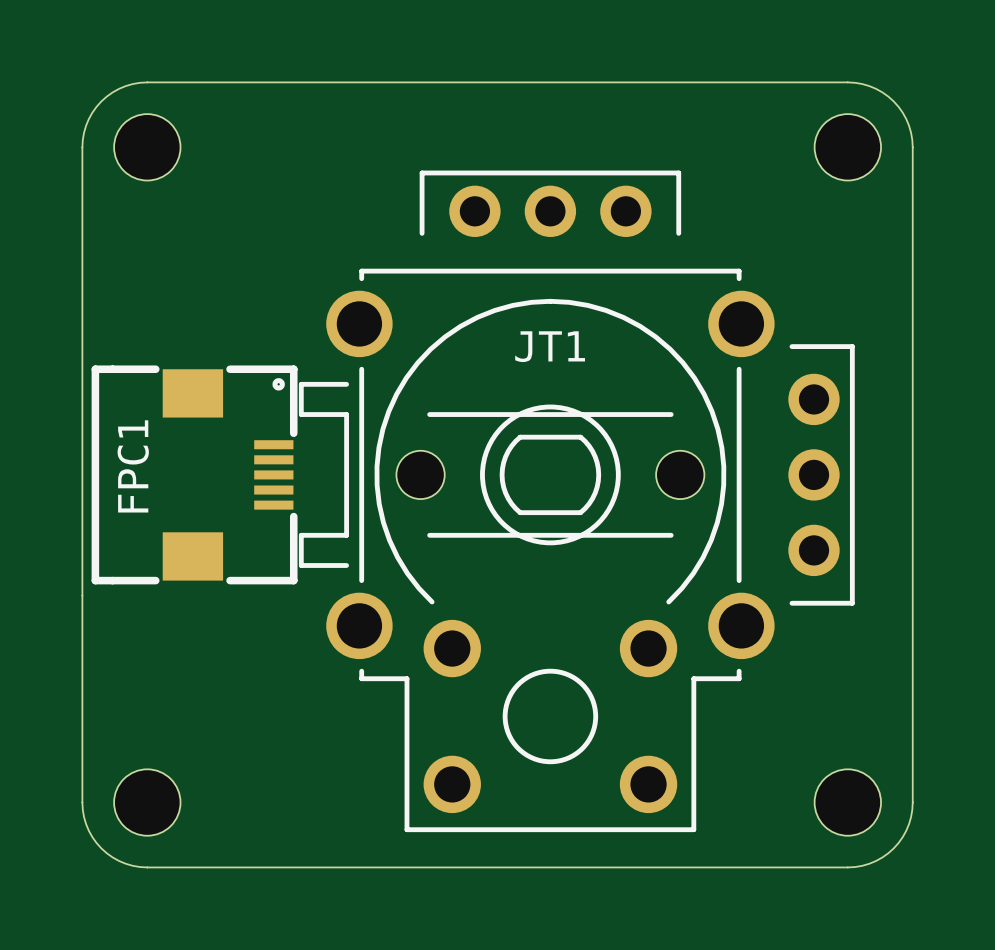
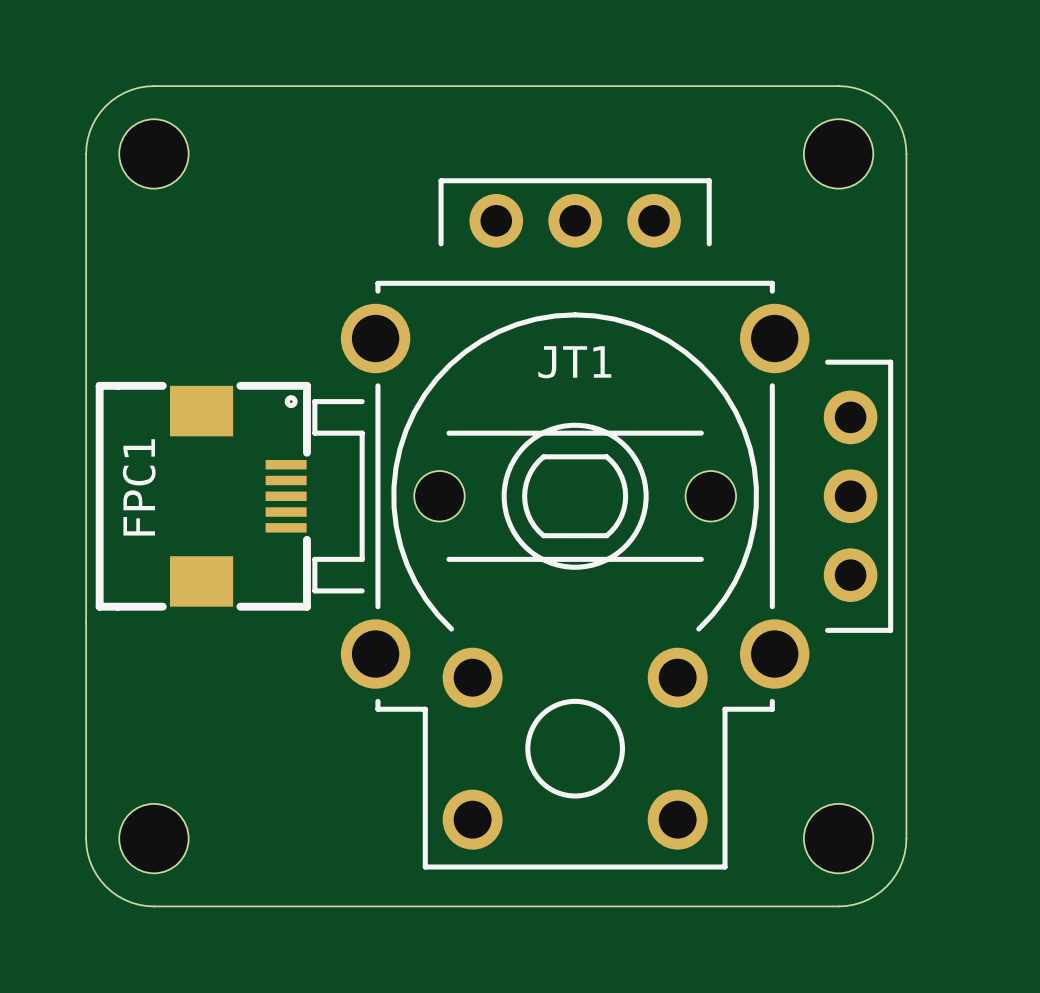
board edge: (802, 82) (855, 82) (869, 86) (882, 92) (893, 101) (902, 112) (909, 125) (912, 147) (912, 809) (909, 823) (902, 837) (888, 853) (875, 861) (855, 867) (802, 867) -> (838, 86) (861, 89) (874, 96) (886, 105) (896, 117) (902, 131) (906, 153) (906, 846) (899, 868) (891, 880) (880, 891) (861, 902) (838, 906)
part position: (847, 147) -> (838, 153)
part position: (847, 802) -> (838, 838)

